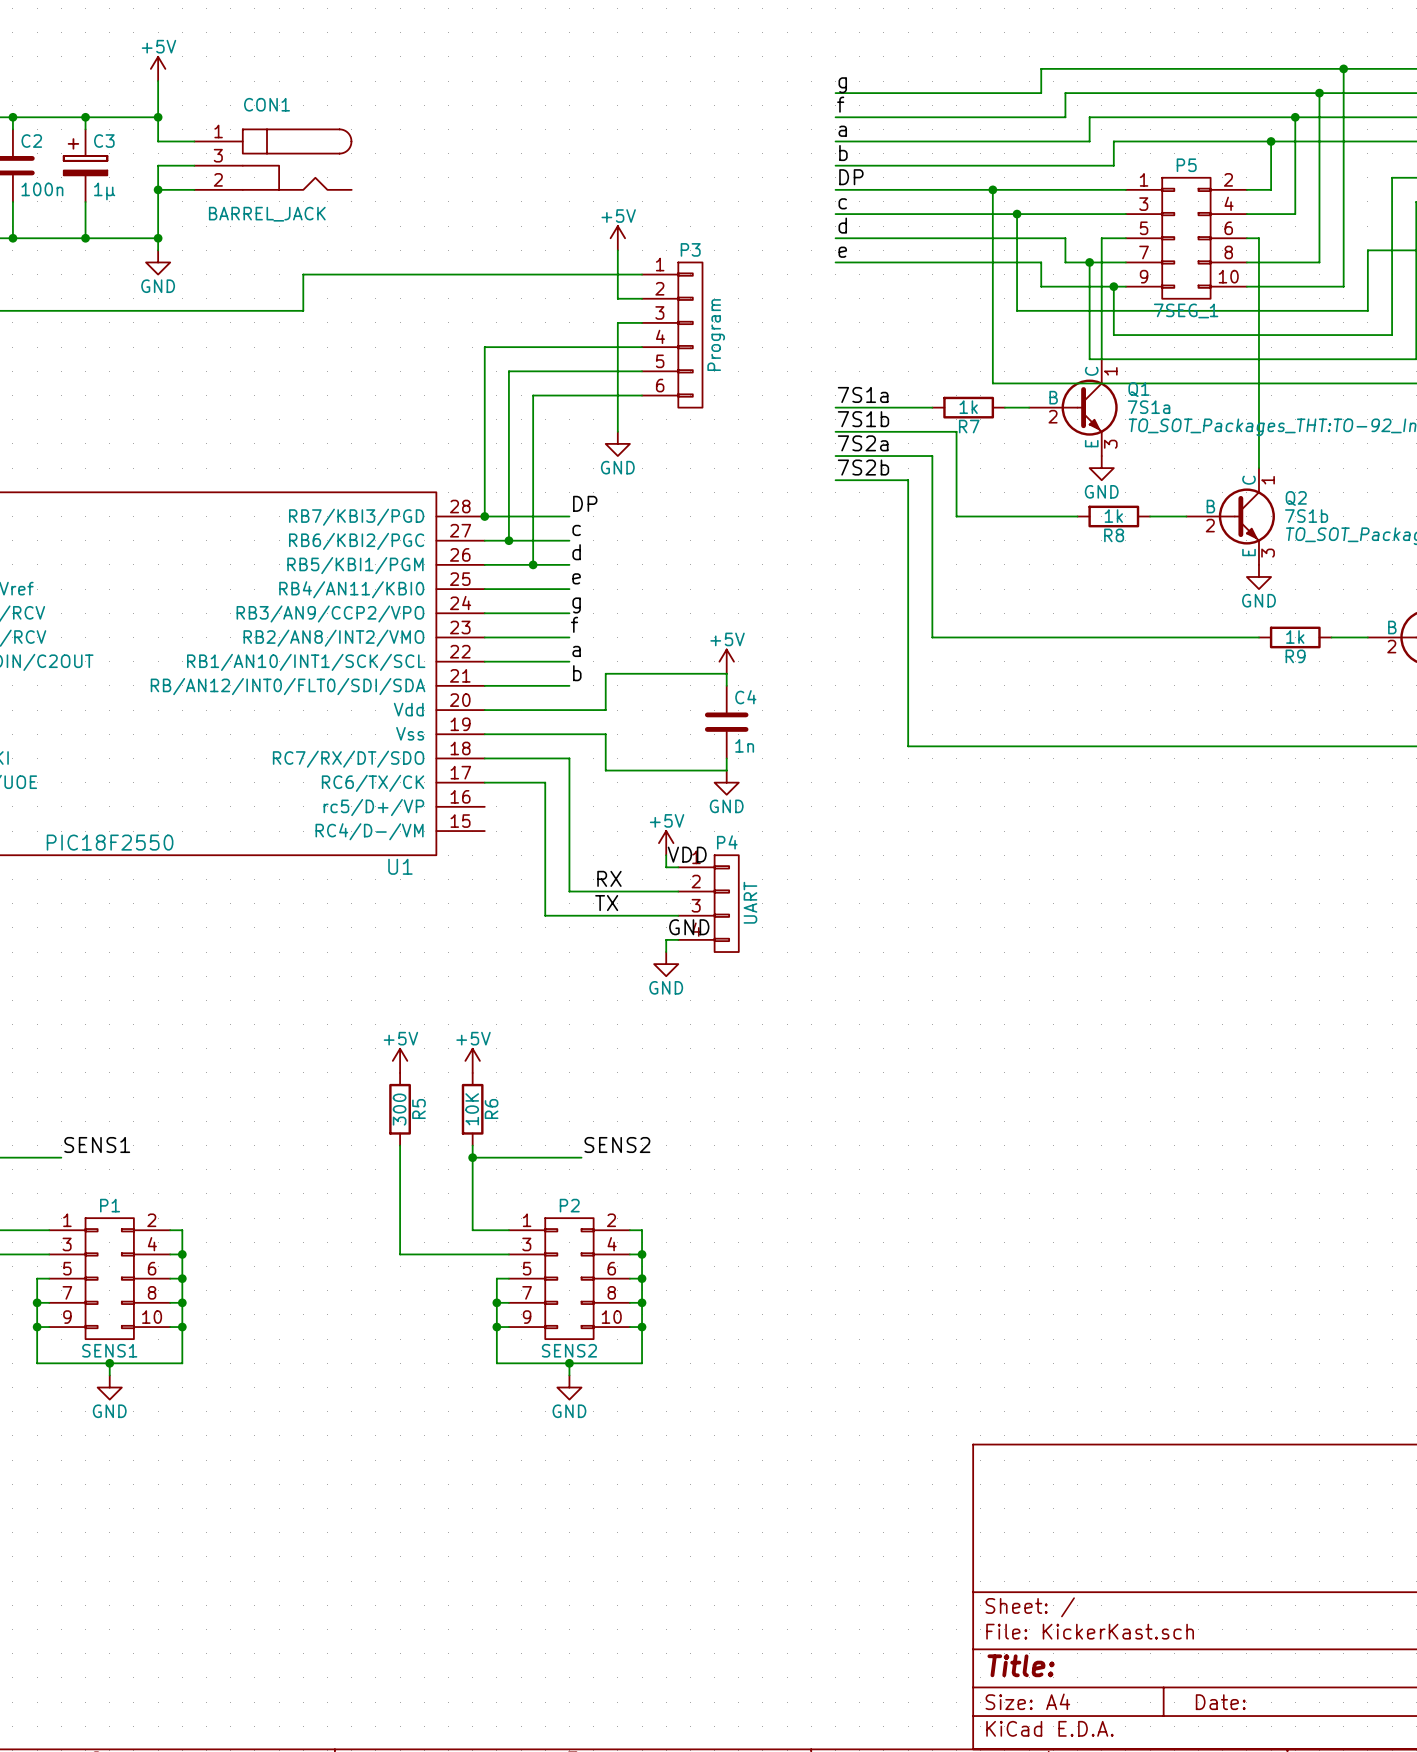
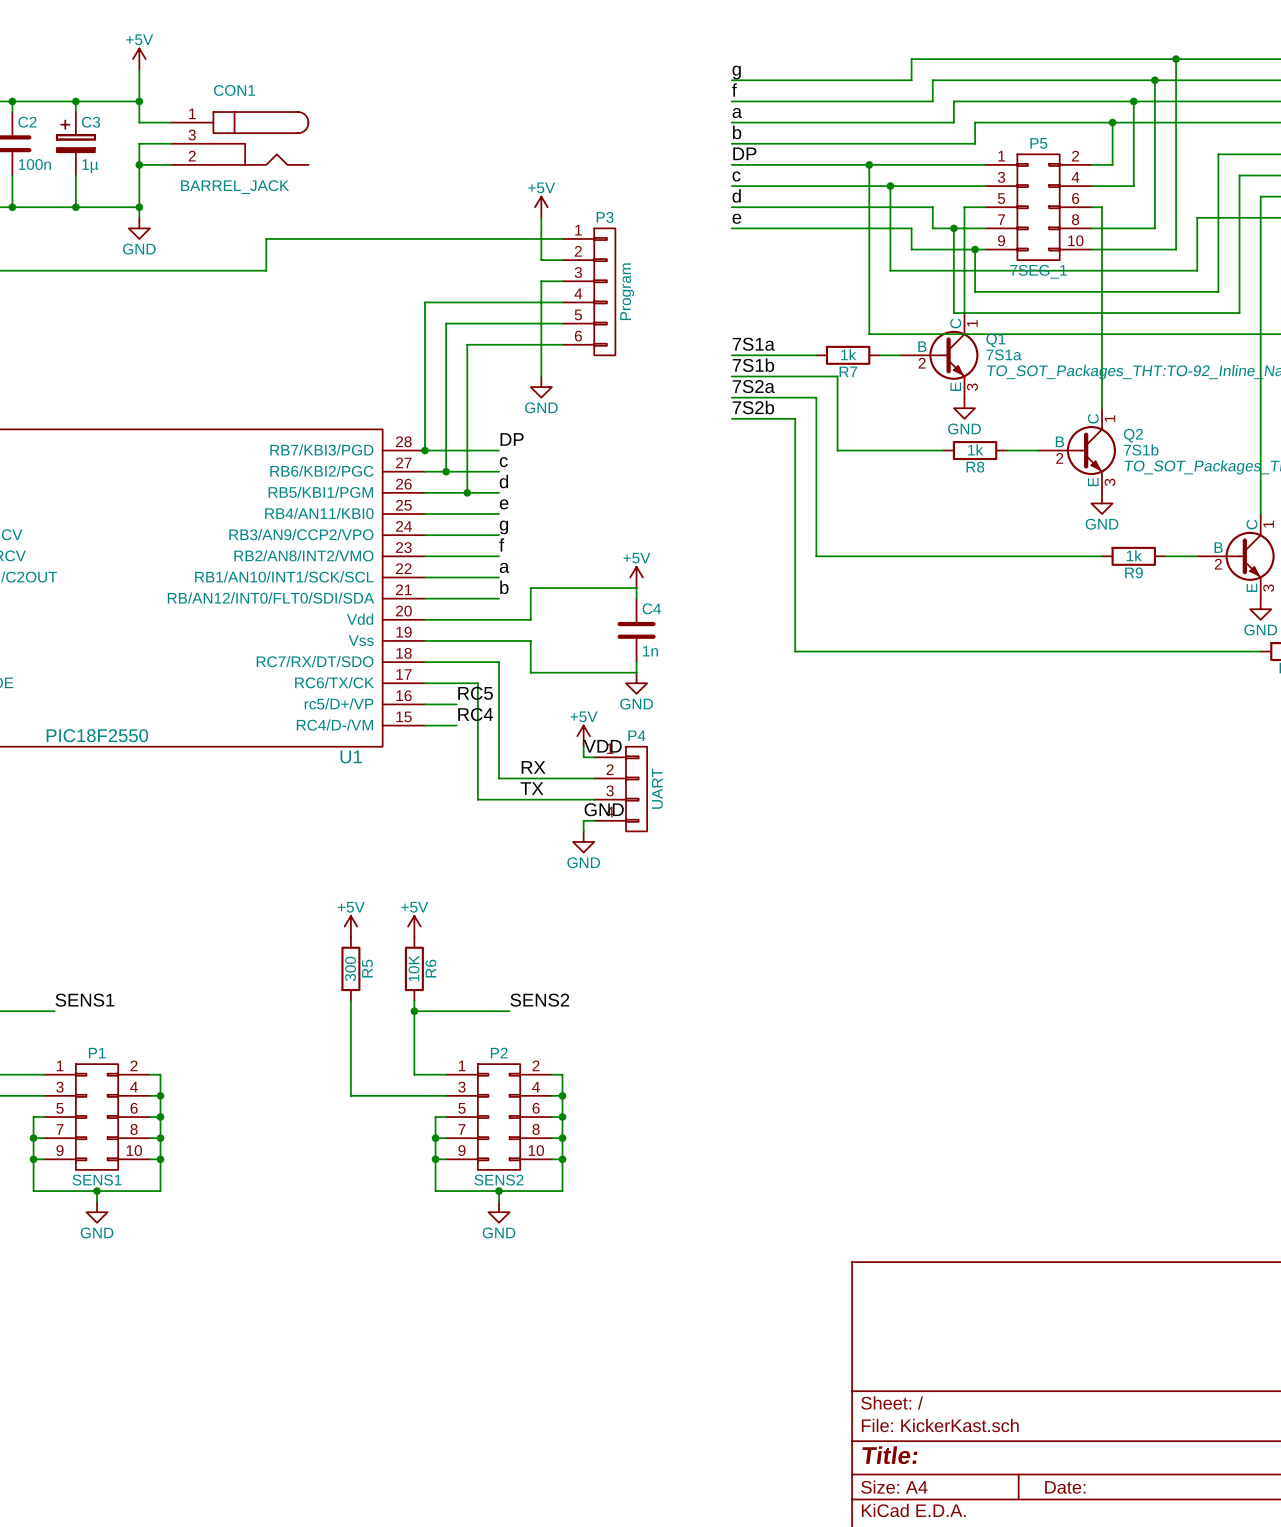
label: none -> RC5 (475, 693)
wire: none -> (424, 704) (456, 704)
label: none -> RC4 (475, 714)
wire: none -> (424, 725) (456, 725)

